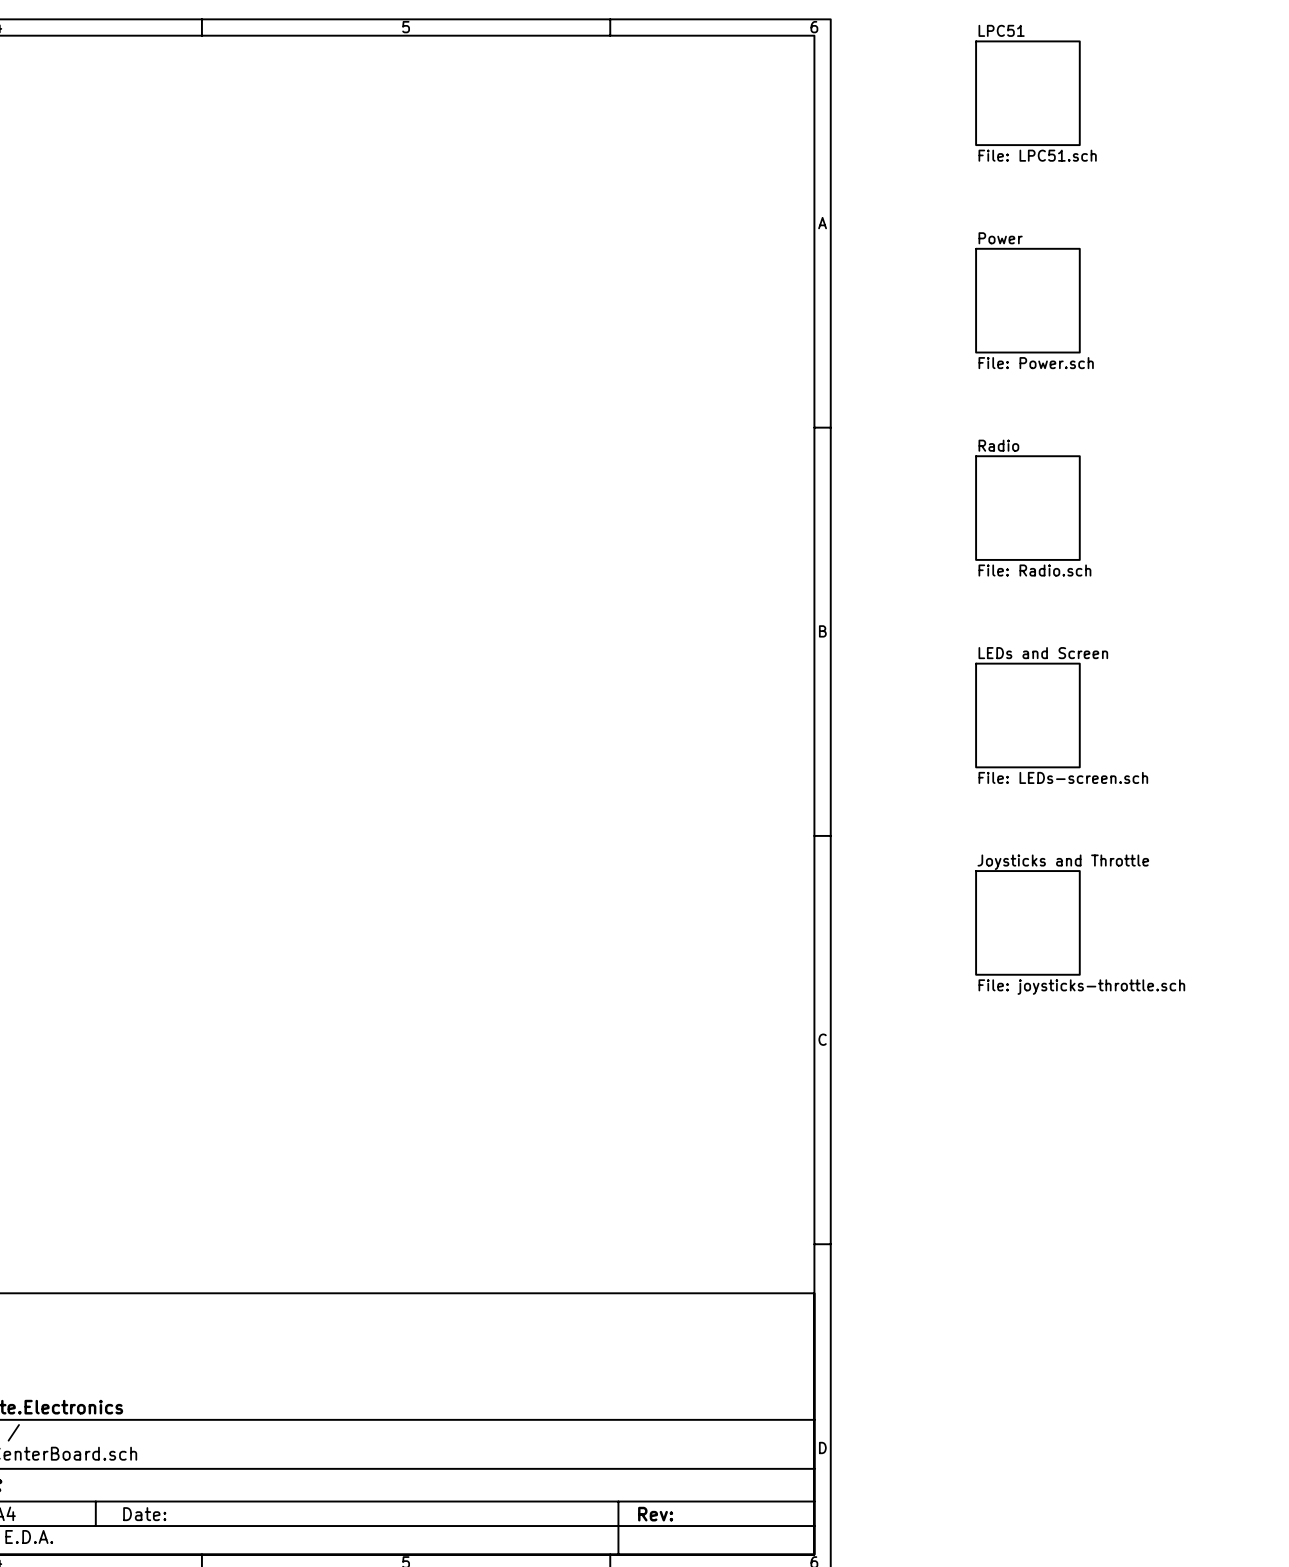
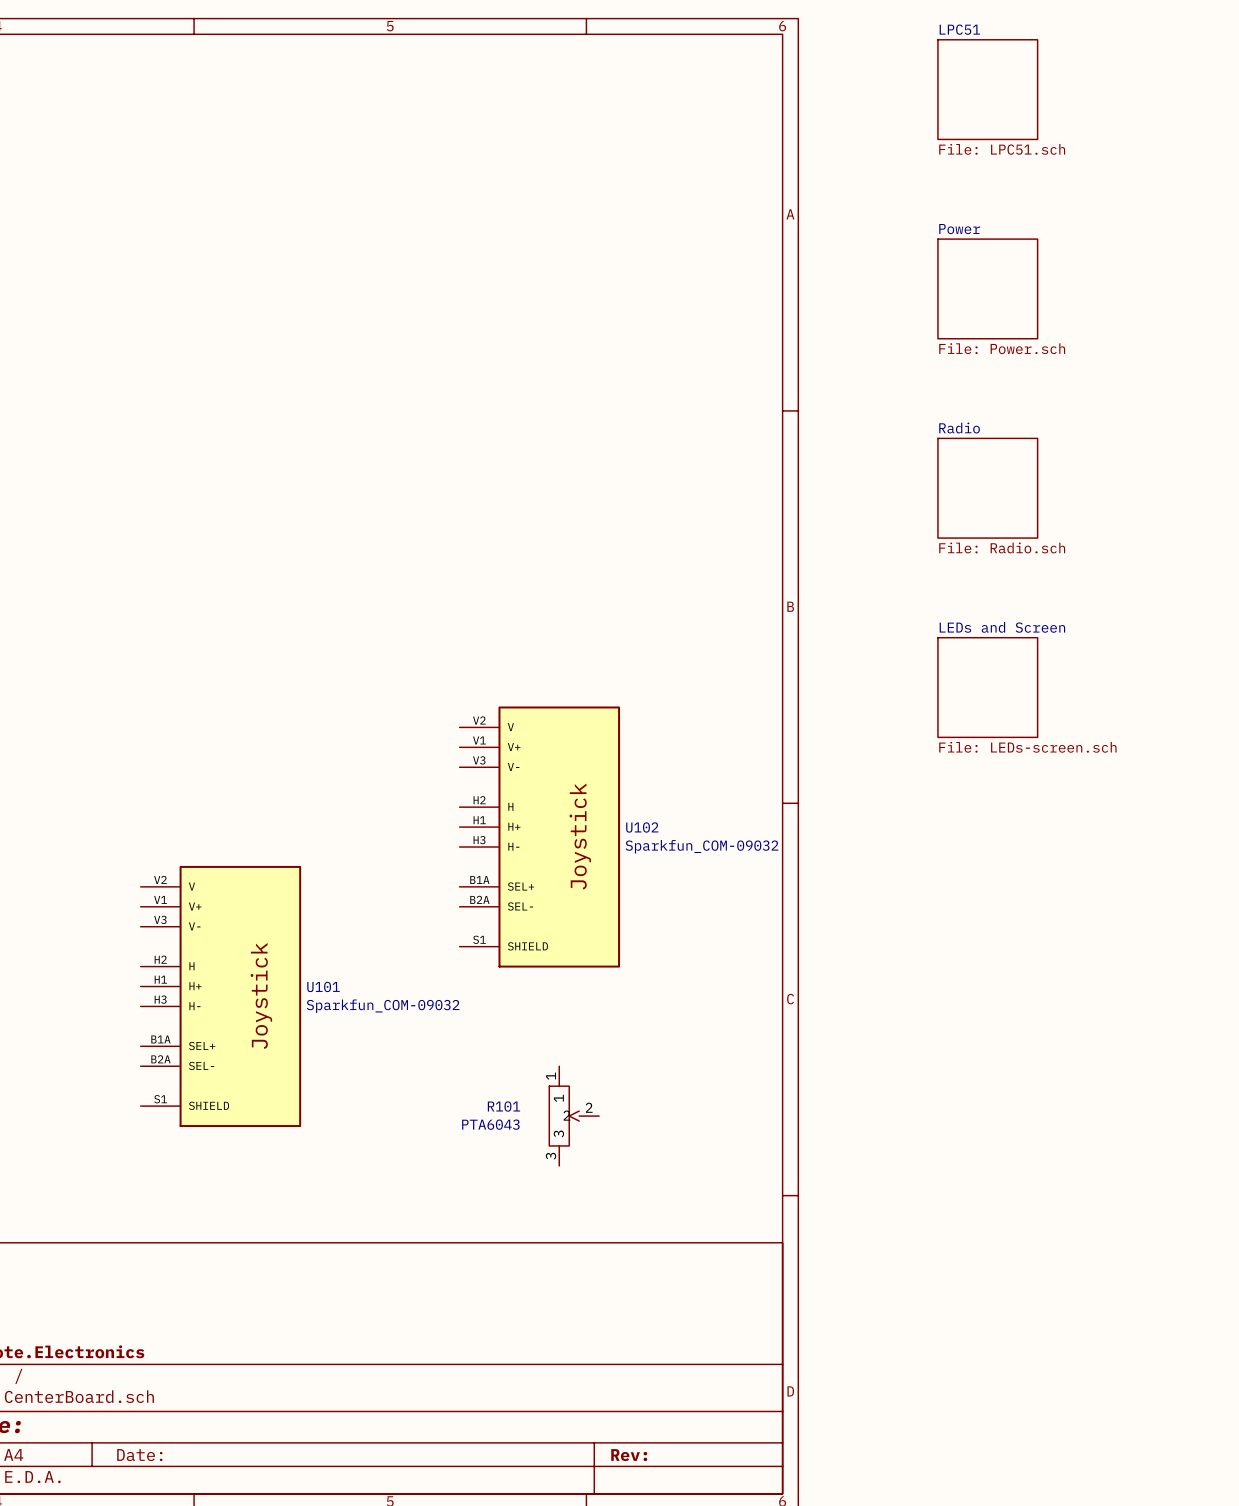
U102: none -> Sparkfun_COM-09032 (539, 837)
sheet Joysticks and Throttle: File: joysticks-throttle.sch (1027, 922) -> none
U101: none -> Sparkfun_COM-09032 (220, 996)
R101: none -> PTA6043 (574, 1116)

